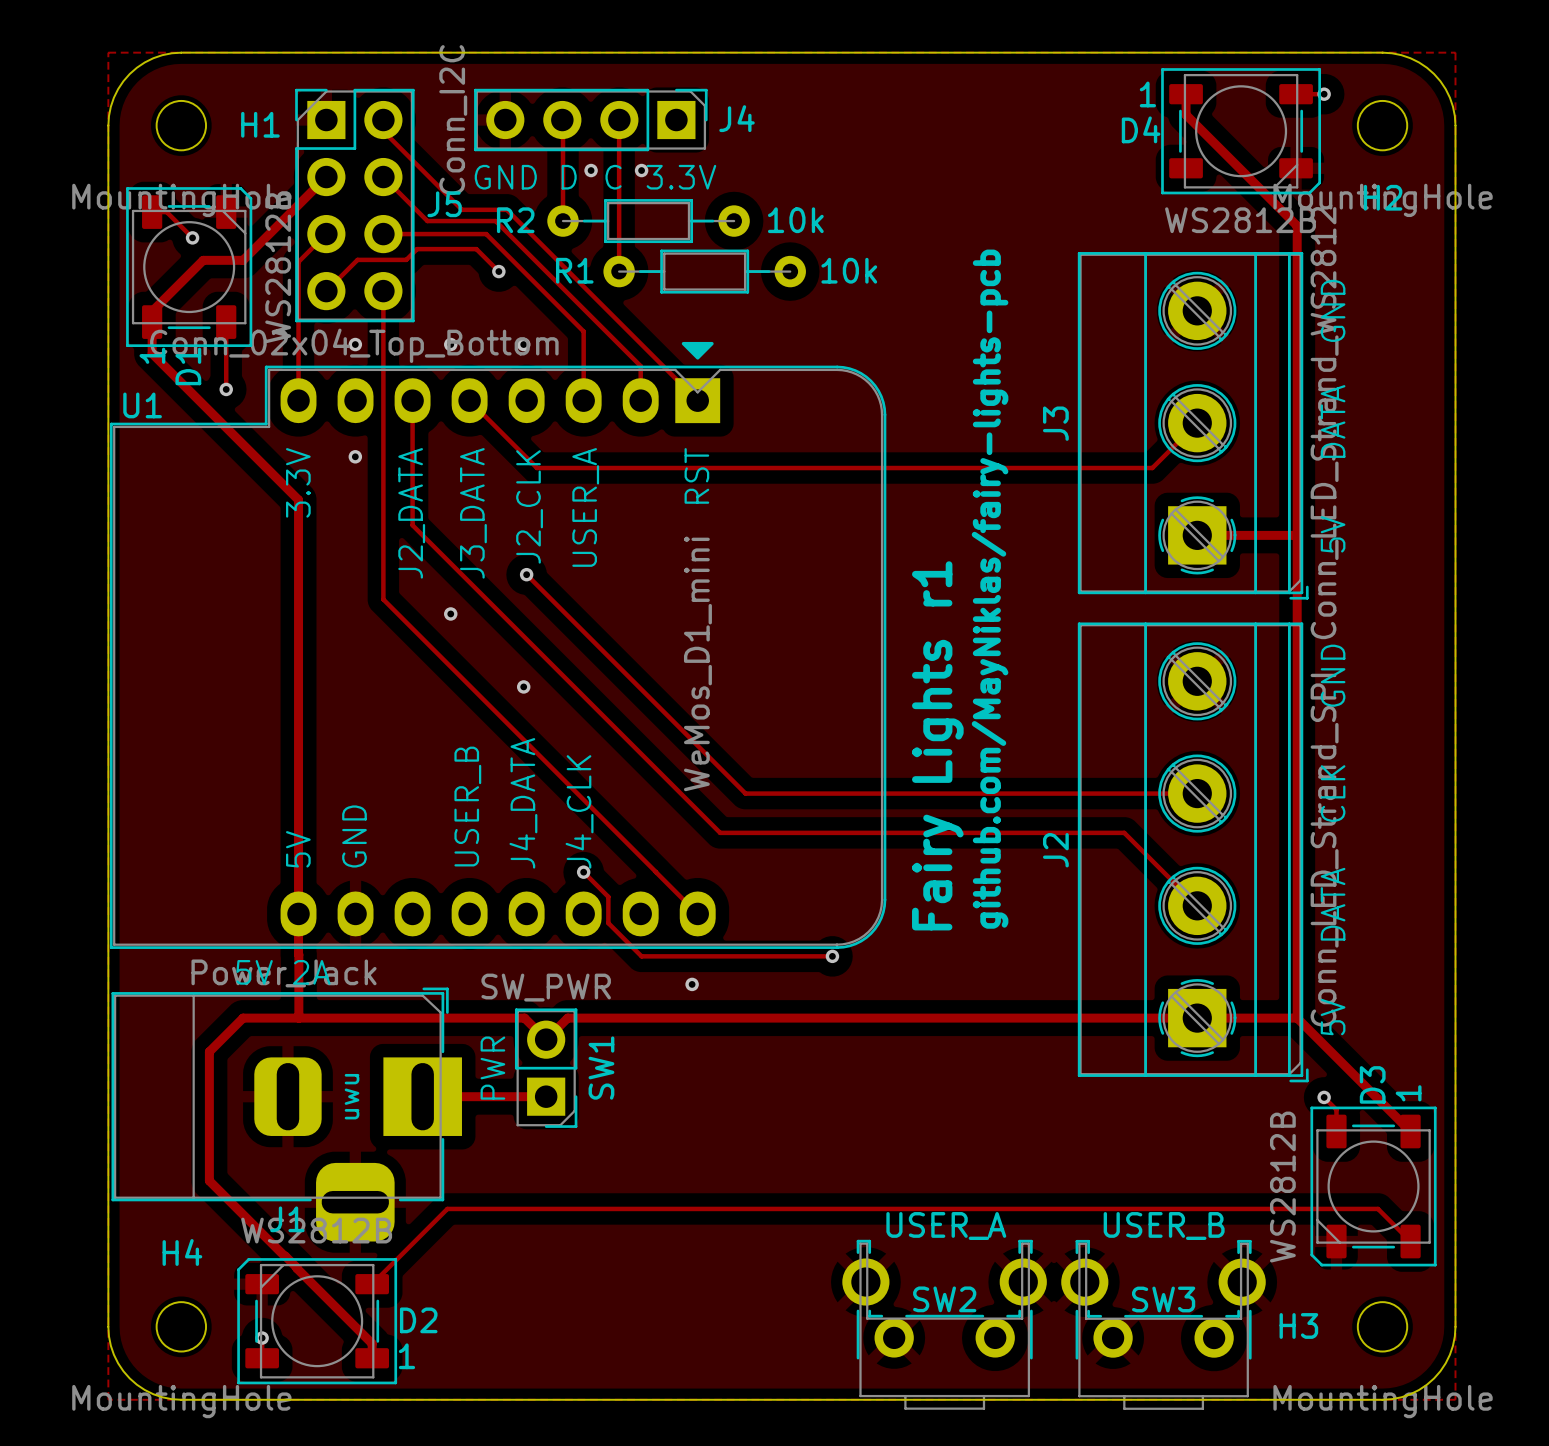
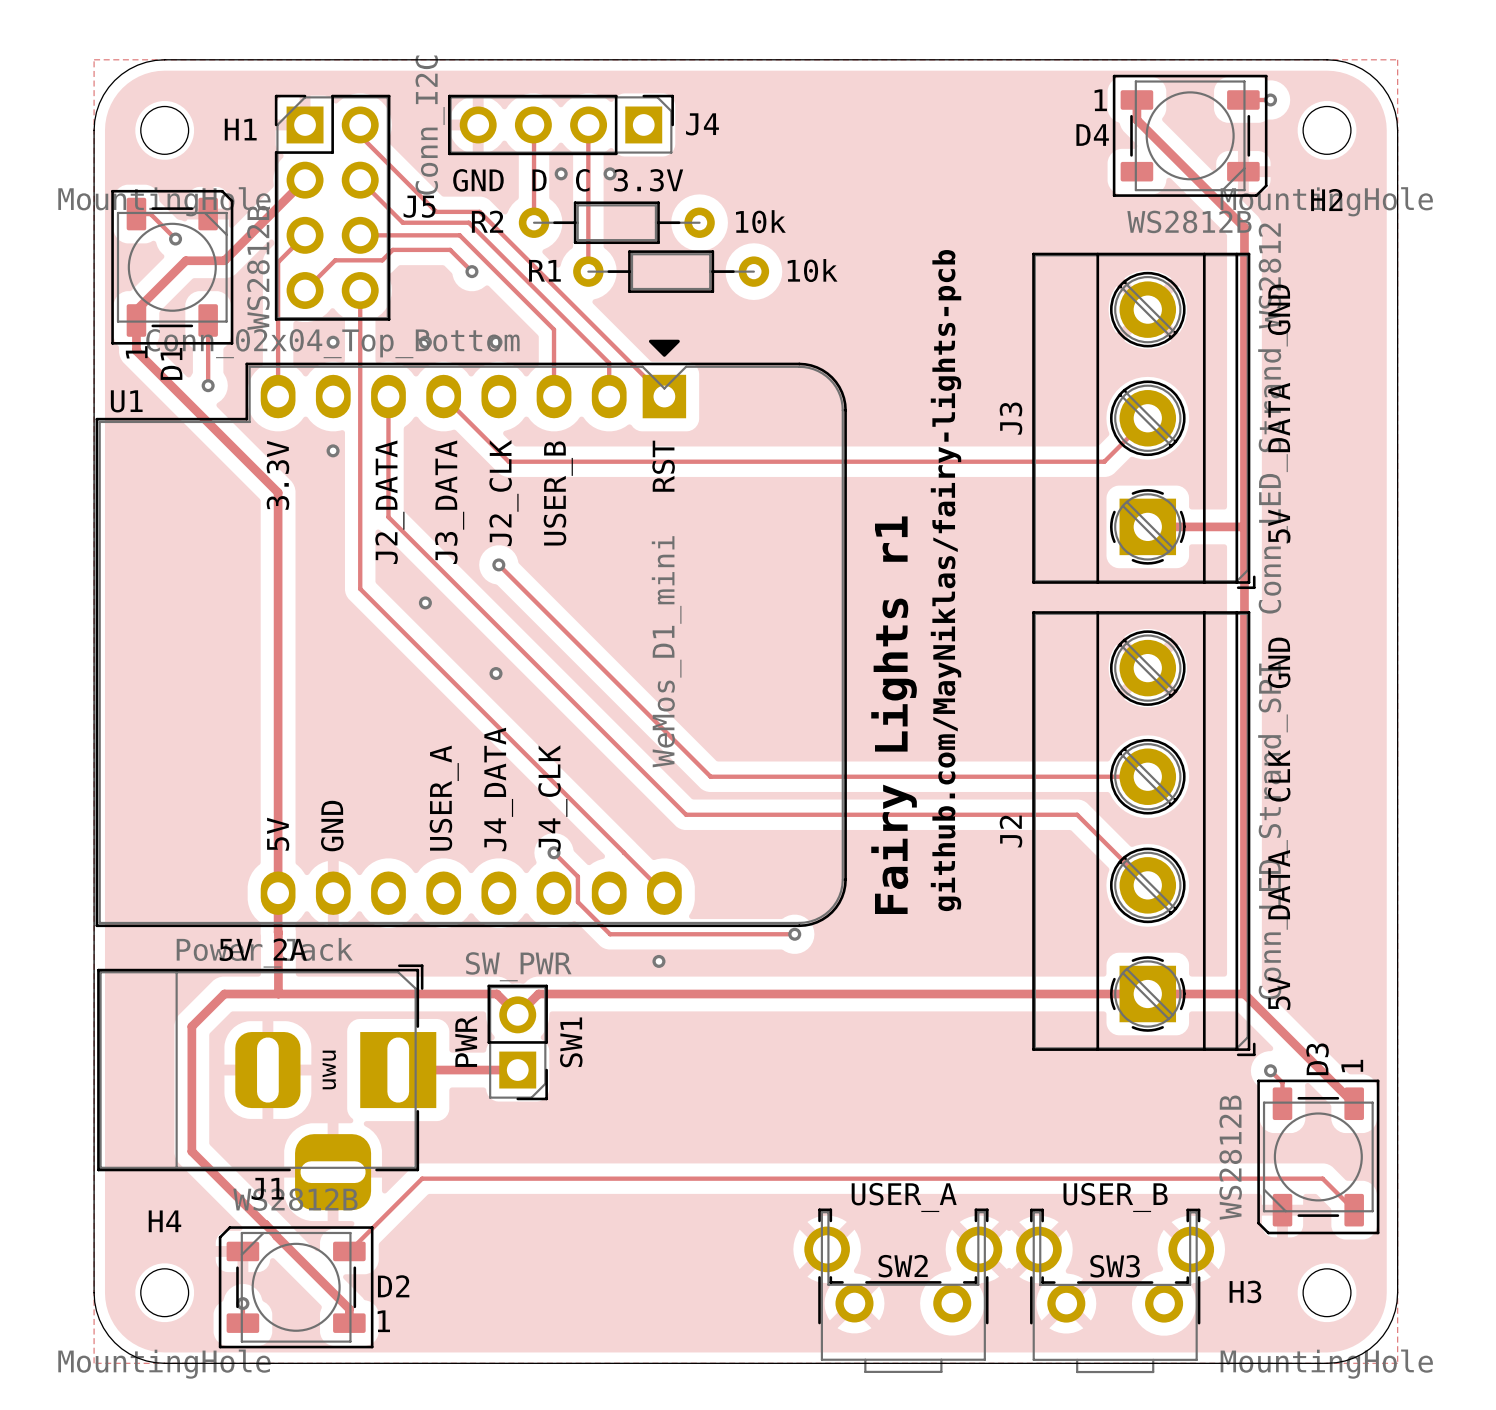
text: USER_A (585, 507) -> USER_B (558, 493)
text: USER_B (467, 806) -> USER_A (444, 798)

